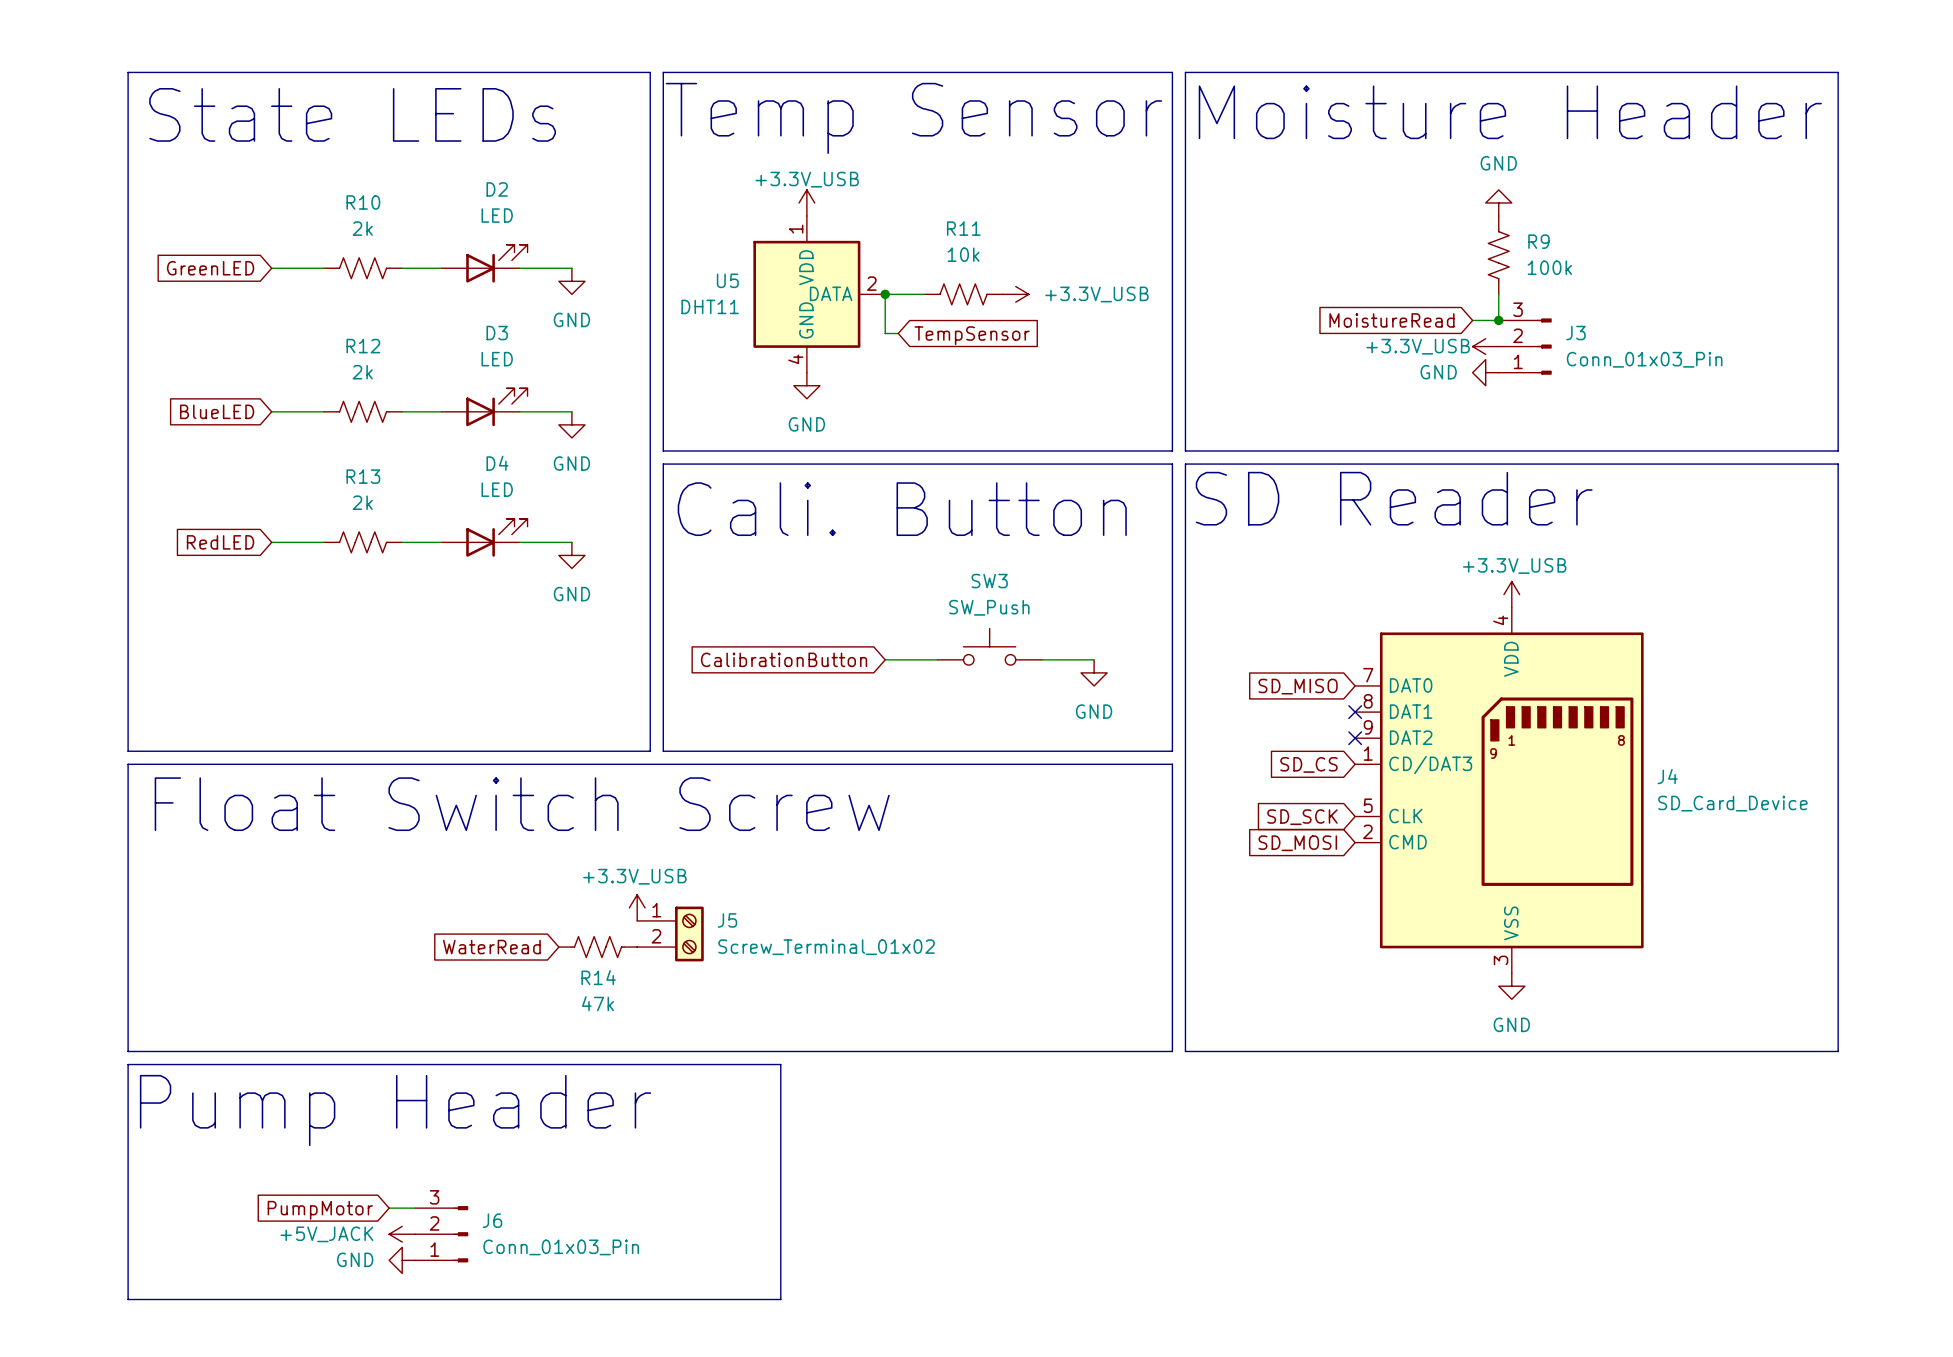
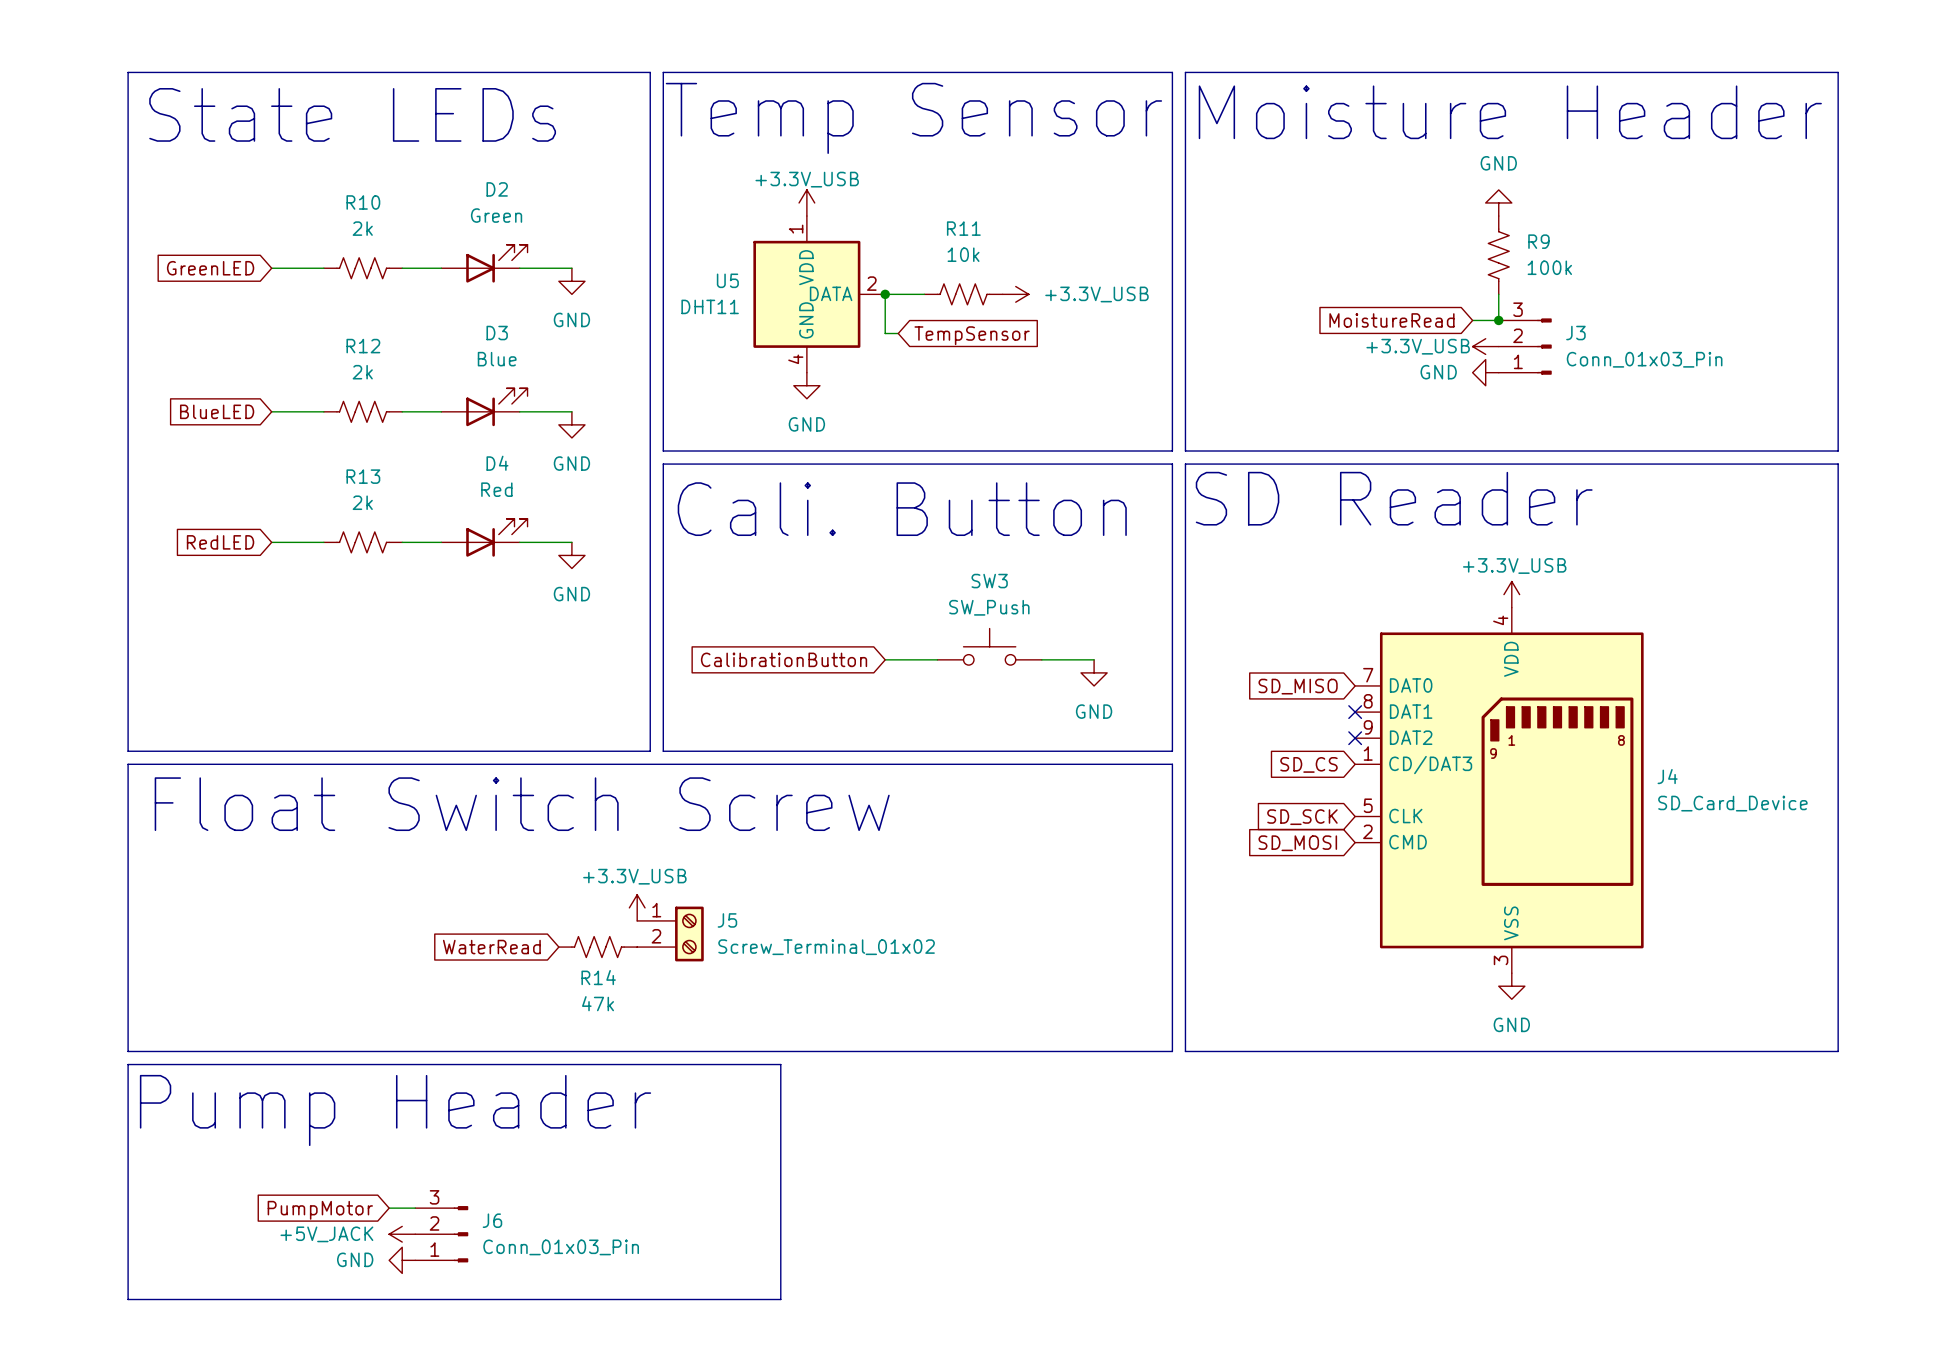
D2 value: LED (497, 215) -> Green (496, 215)
D3 value: LED (497, 359) -> Blue (497, 359)
D4 value: LED (497, 489) -> Red (496, 489)

